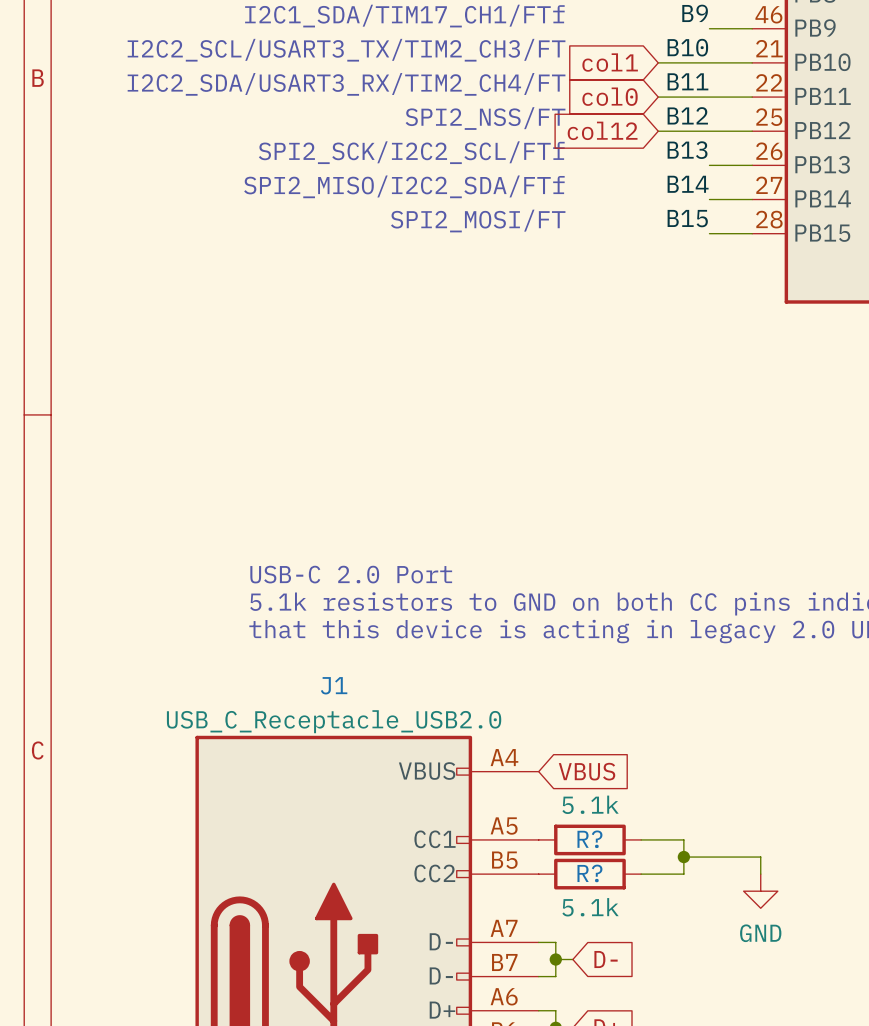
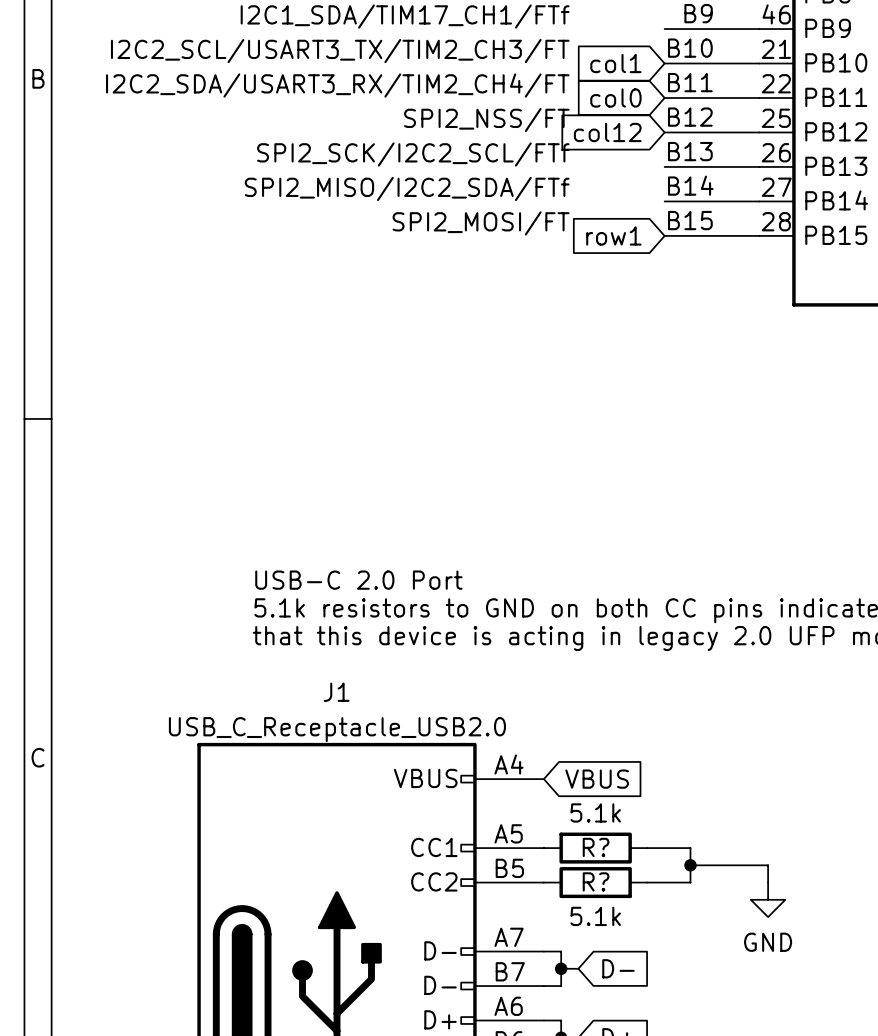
wire: none -> (664, 29) (716, 29)
wire: none -> (664, 166) (716, 166)
wire: none -> (664, 201) (716, 201)
global label: none -> row1 (613, 235)
wire: none -> (664, 235) (716, 235)

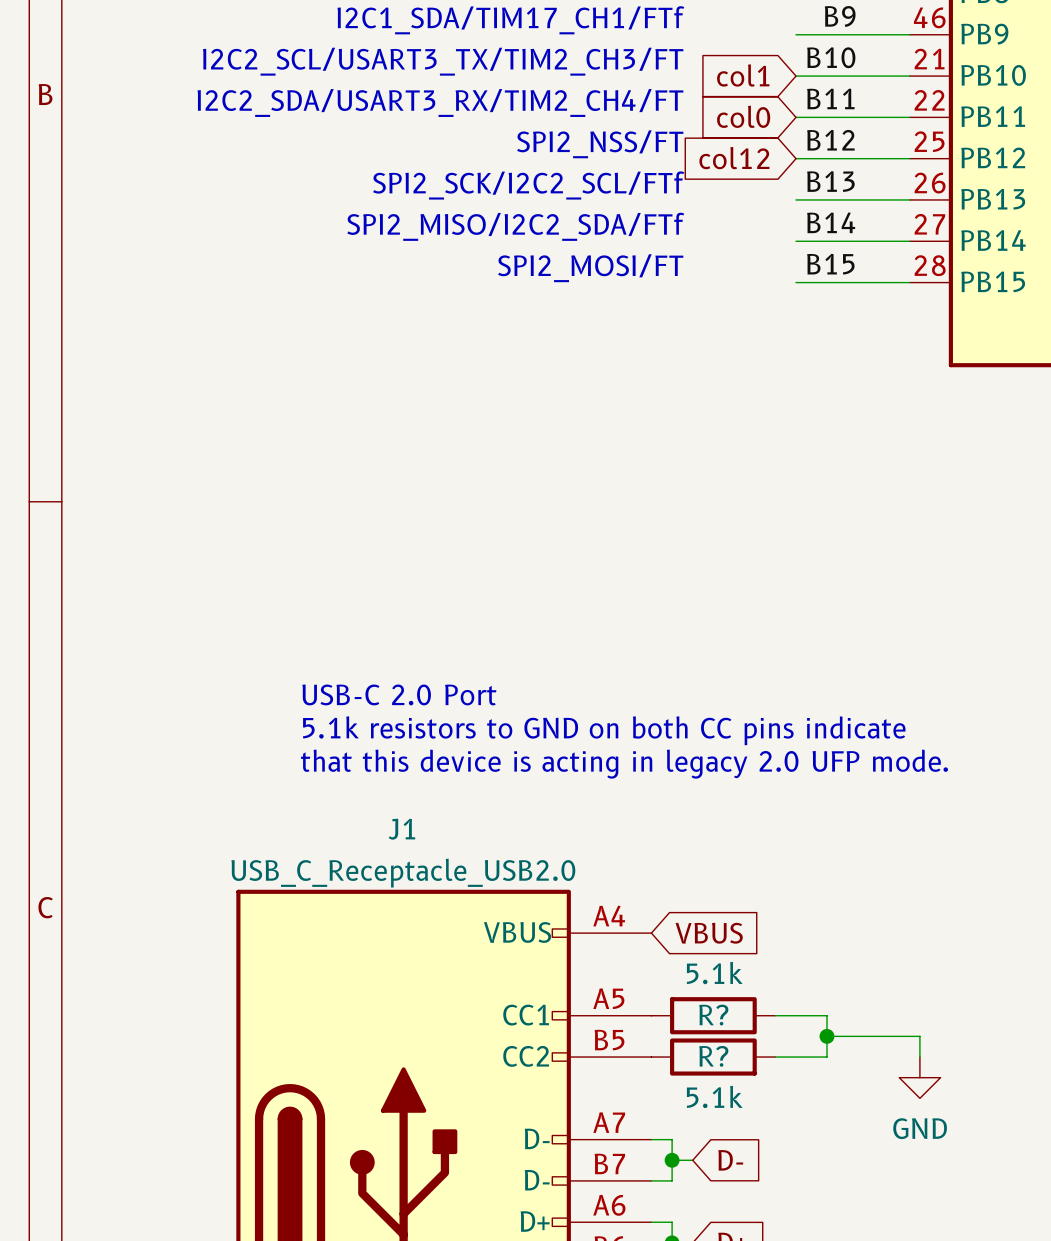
global label: row1 (613, 235) -> none

